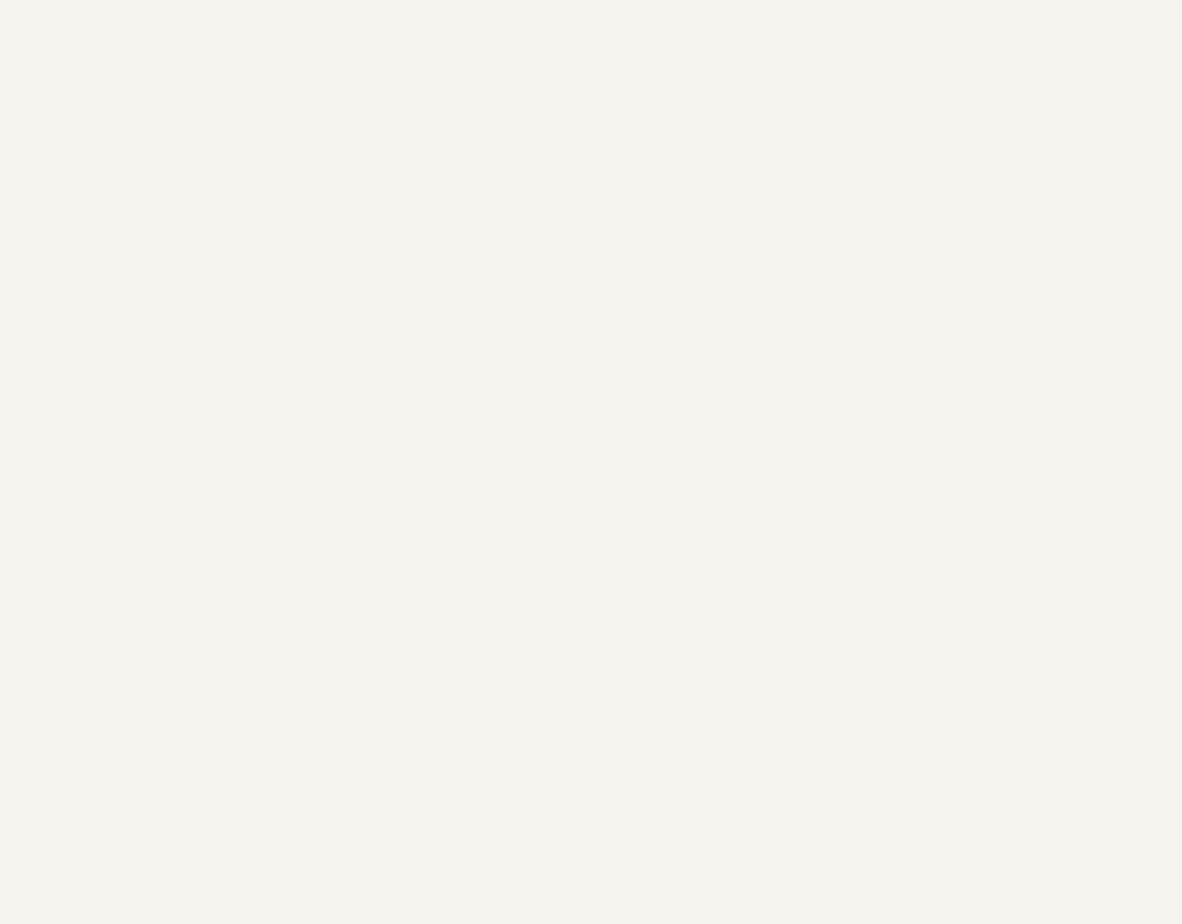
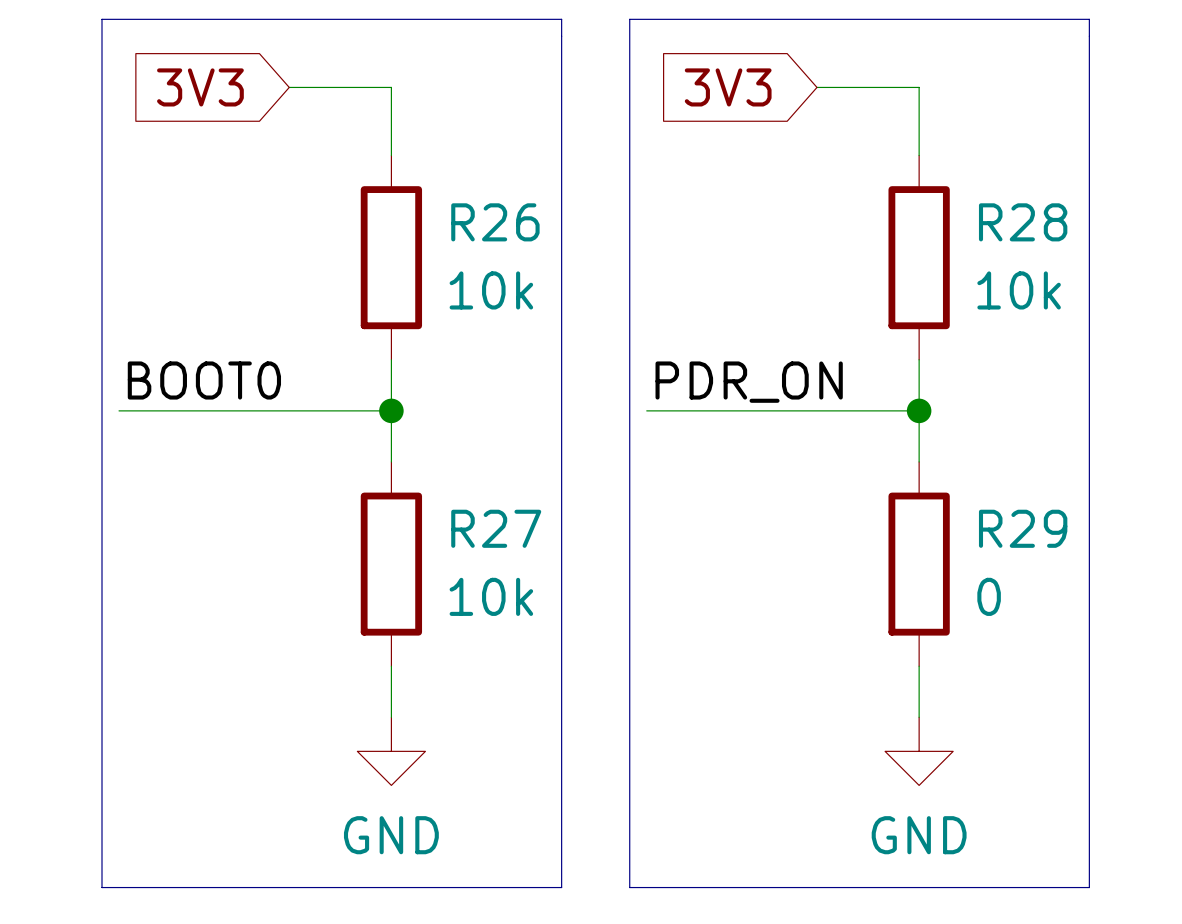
line: none -> (102, 19) (102, 887) (561, 887) (561, 19) (102, 19)
line: none -> (629, 19) (629, 887) (1089, 887) (1089, 19) (629, 19)
global label: none -> 3V3 (200, 87)
wire: none -> (289, 87) (391, 87) (391, 155)
global label: none -> 3V3 (728, 87)
wire: none -> (816, 87) (919, 87) (919, 155)
R26: none -> 10k (391, 257)
R28: none -> 10k (919, 257)
wire: none -> (391, 359) (391, 461)
wire: none -> (919, 359) (919, 461)
label: none -> BOOT0 (204, 380)
label: none -> PDR_ON (749, 382)
wire: none -> (119, 410) (391, 410)
junction: none -> (391, 410)
wire: none -> (646, 410) (919, 410)
junction: none -> (919, 410)
R27: none -> 10k (391, 564)
R29: none -> 0 (919, 564)
wire: none -> (391, 666) (391, 717)
wire: none -> (919, 666) (919, 717)
power symbol: none -> GND (391, 751)
power symbol: none -> GND (919, 751)

